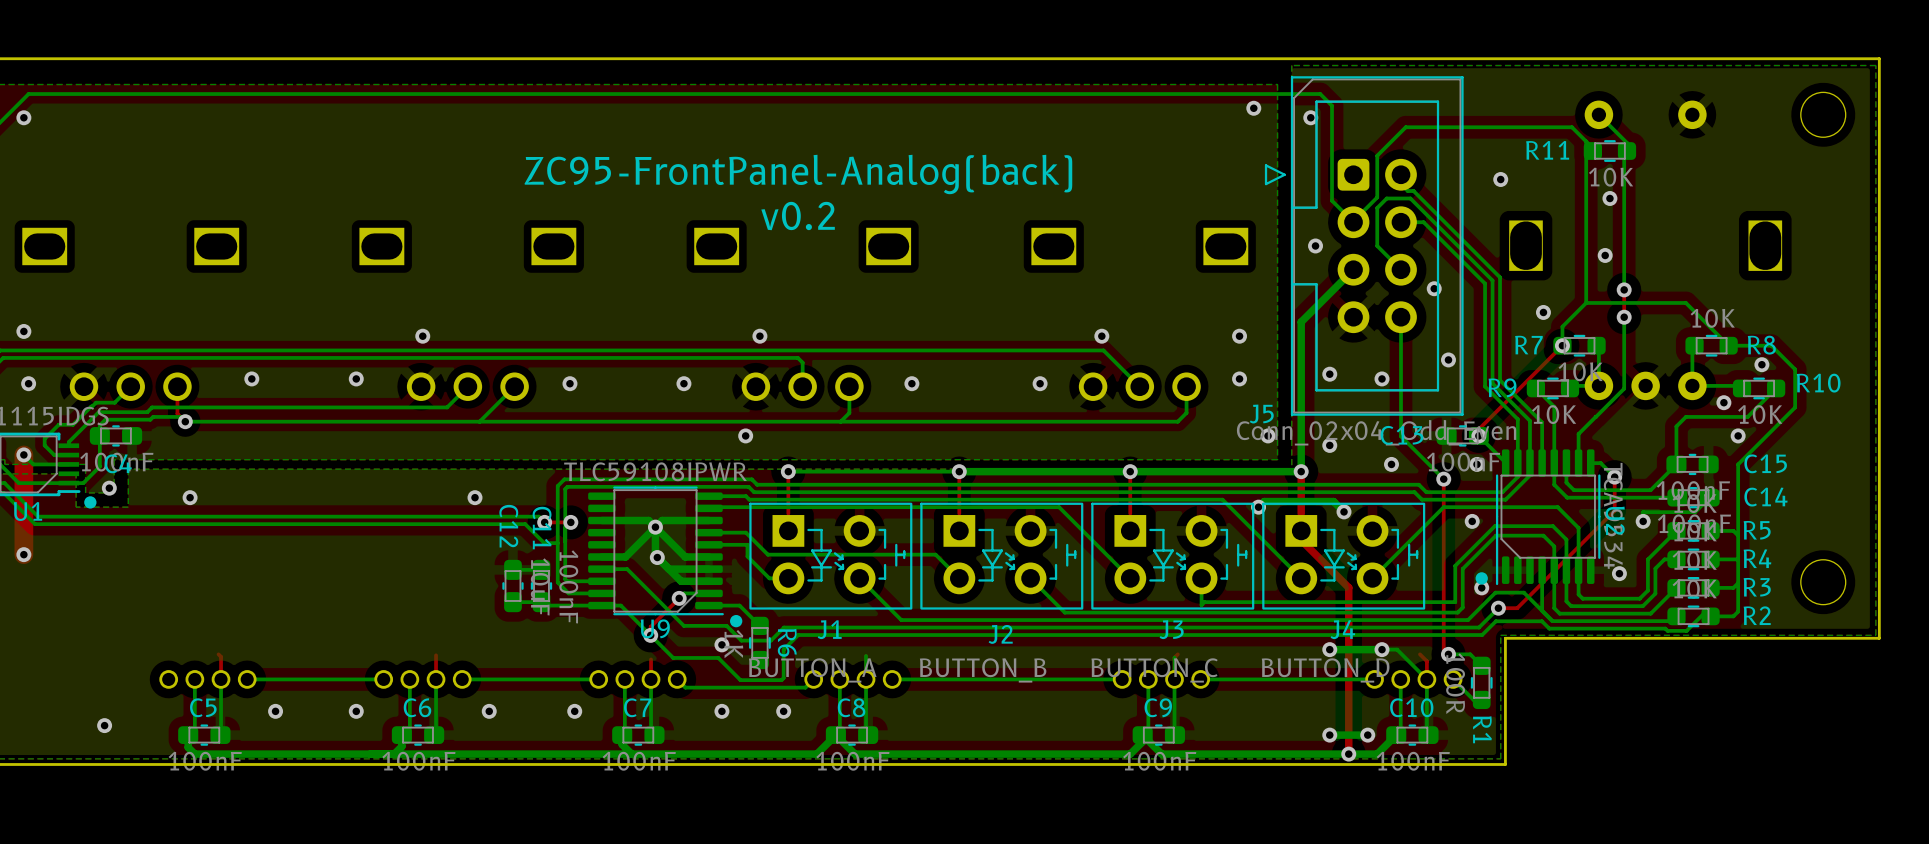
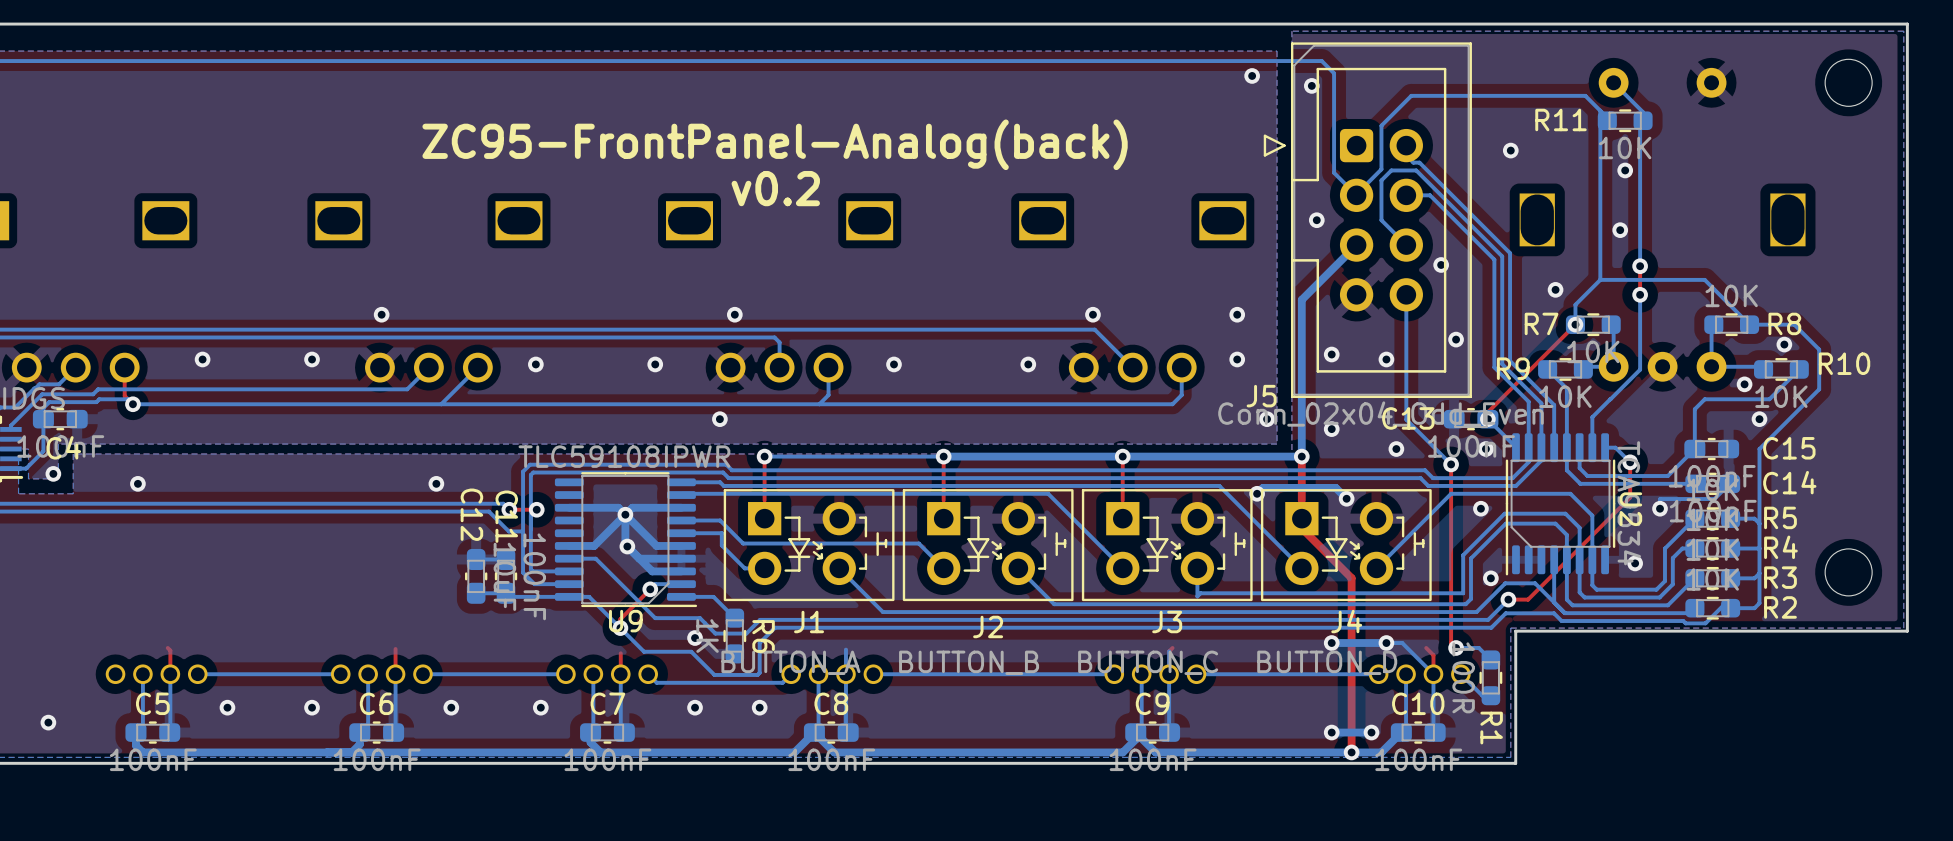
drawing: [84, 496, 97, 509] -> none
drawing: [1475, 572, 1488, 585] -> none
drawing: [730, 614, 743, 628] -> none

